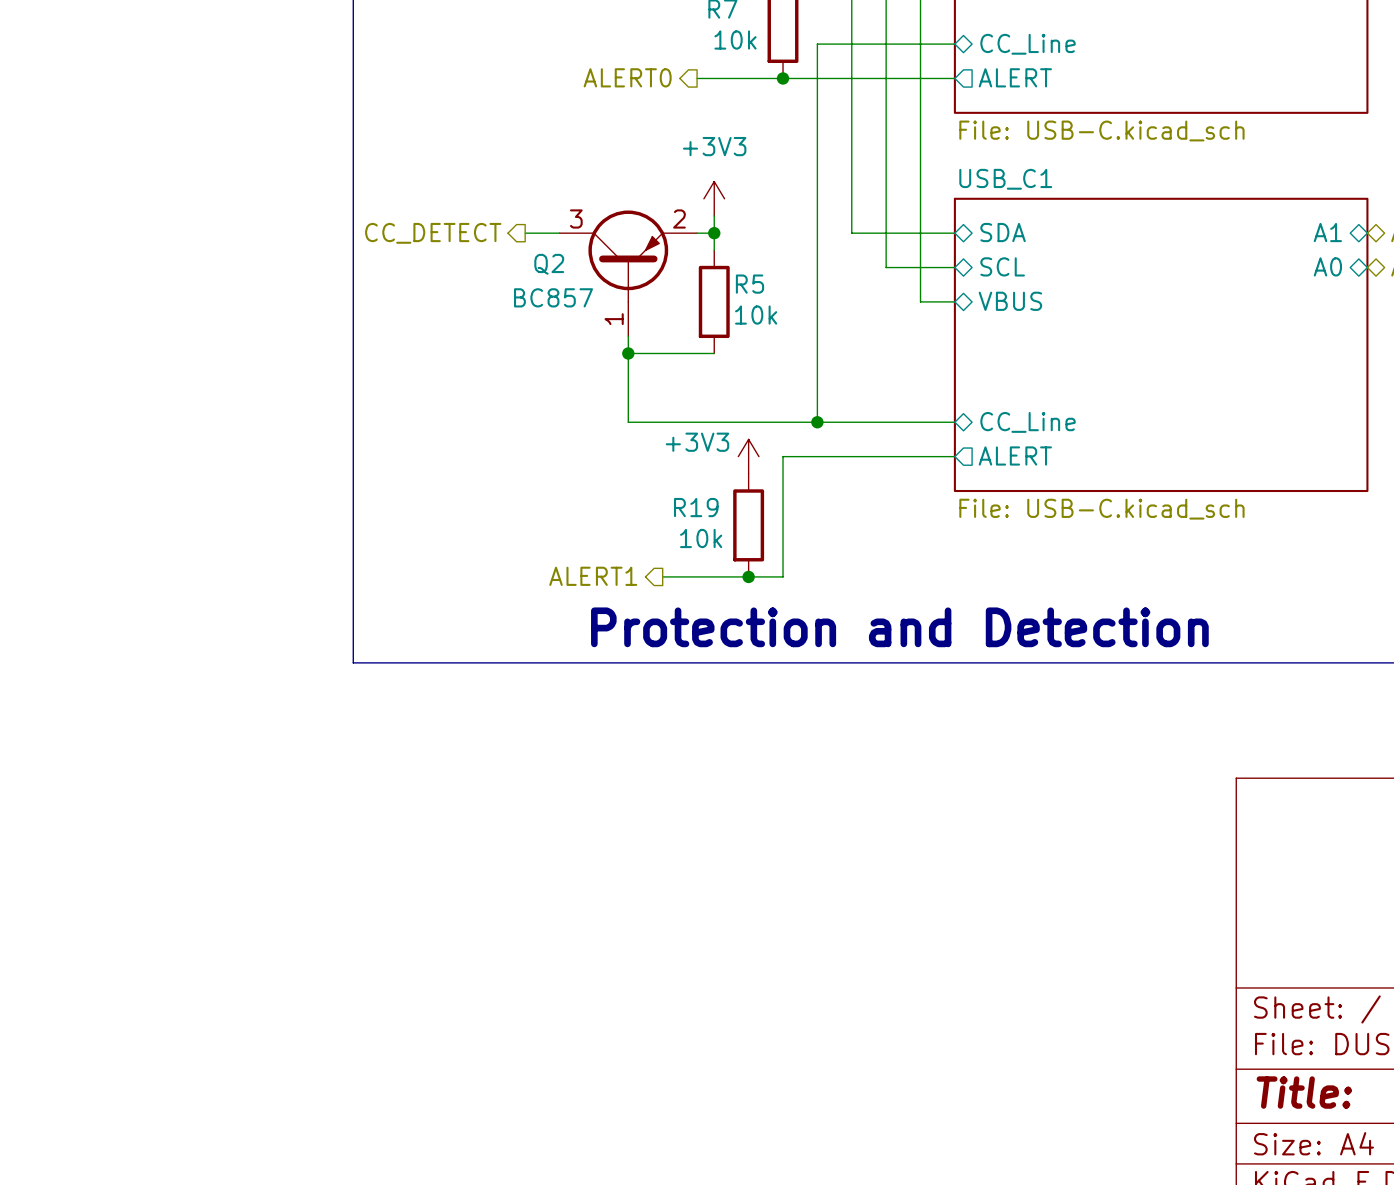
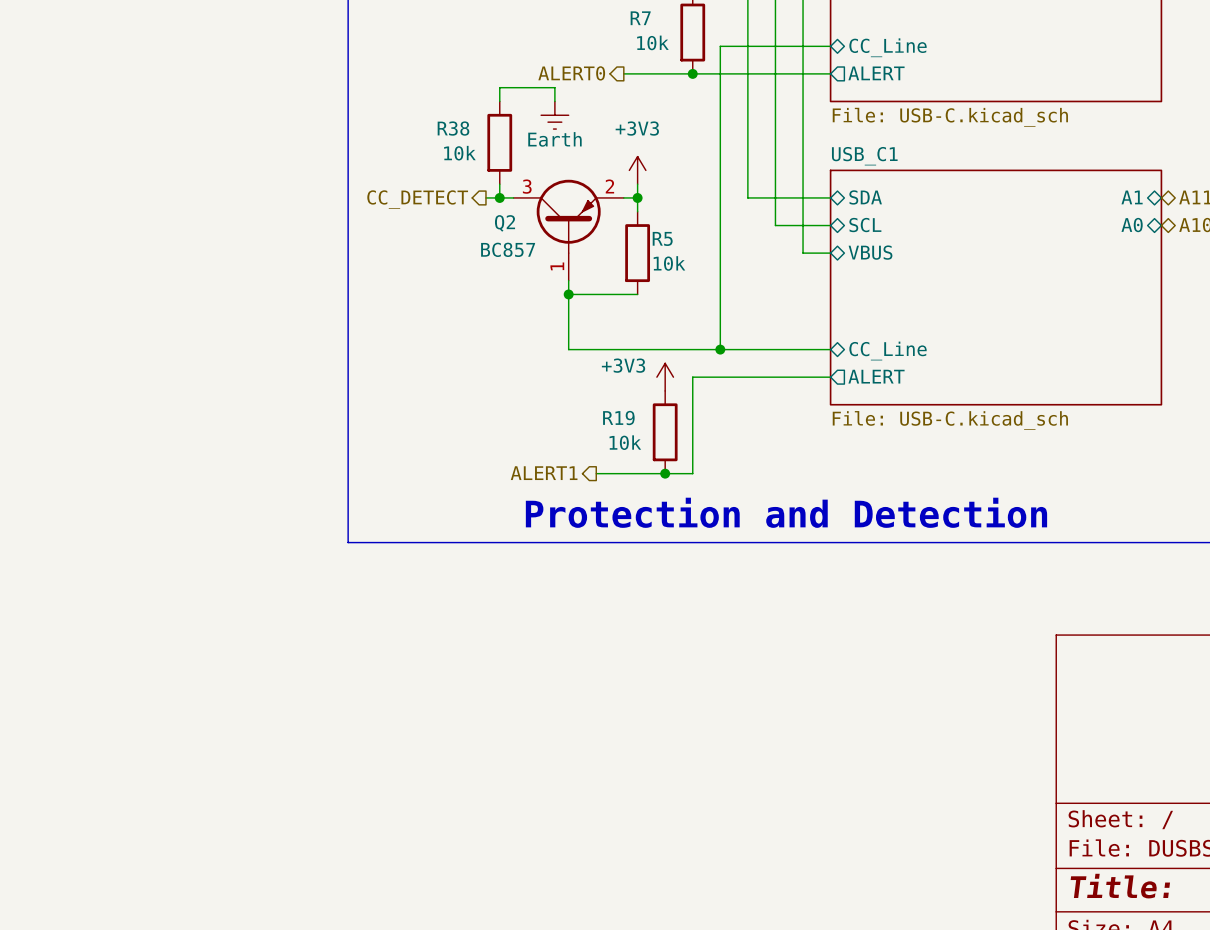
wire: none -> (499, 101) (499, 87) (554, 87) (554, 101)
power symbol: none -> Earth (554, 115)
R38: none -> 10k (499, 142)
wire: none -> (499, 184) (499, 197)
junction: none -> (499, 197)

